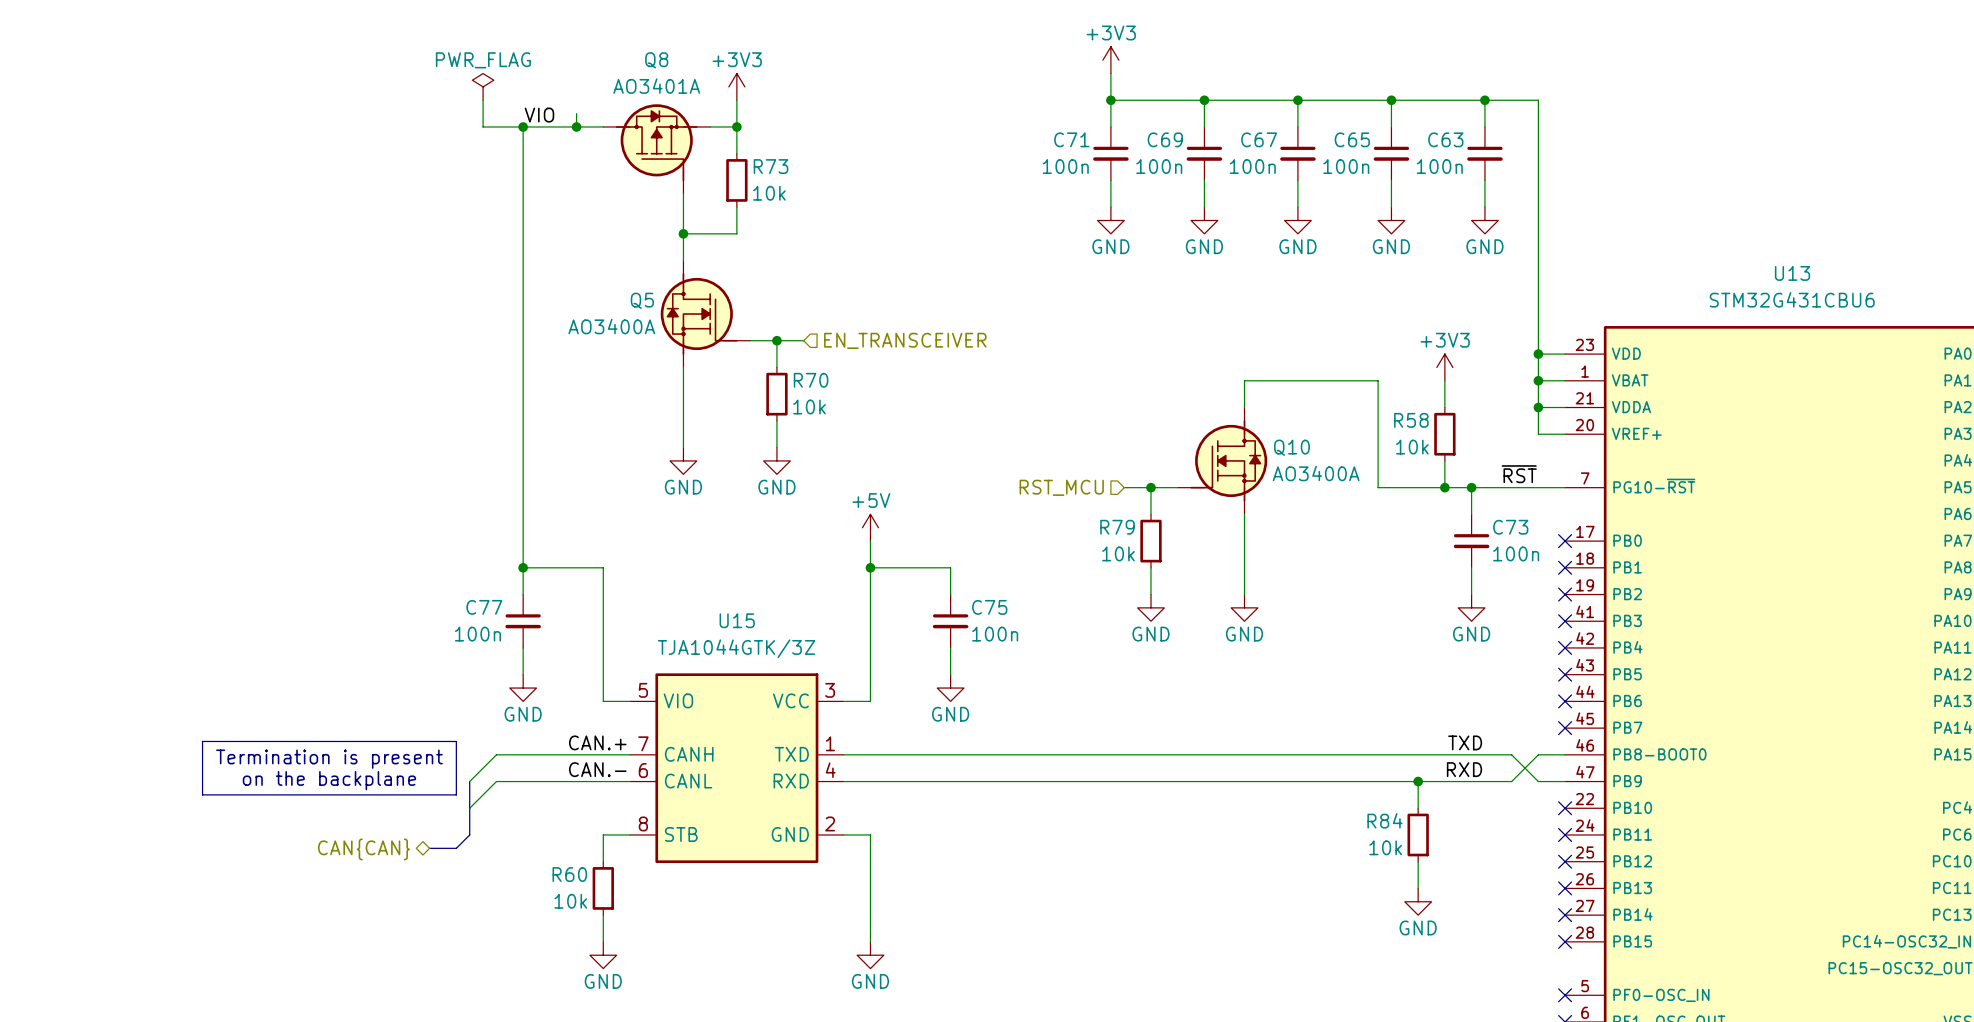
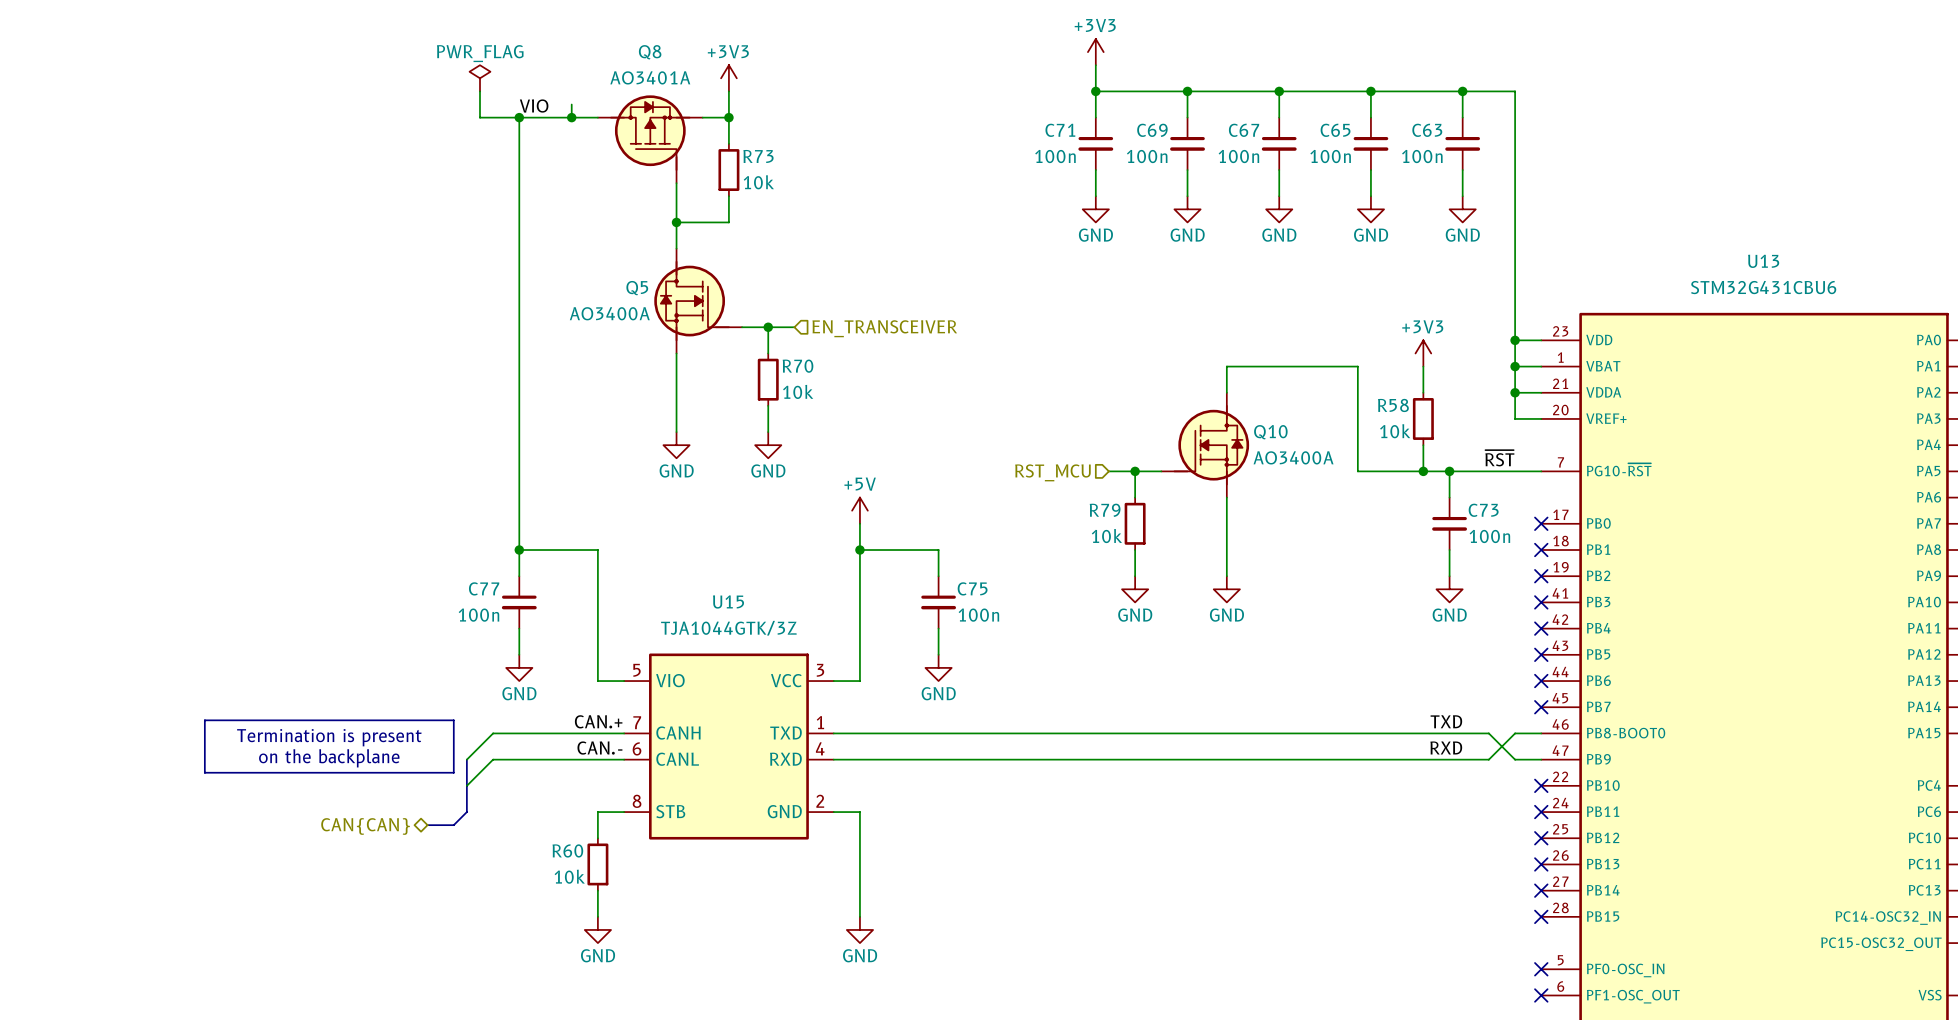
wire: (1418, 781) (1418, 808) -> none
junction: (1418, 781) -> none
R84: (1418, 834) -> none
wire: (1418, 861) (1418, 888) -> none
power symbol: GND (1418, 901) -> none

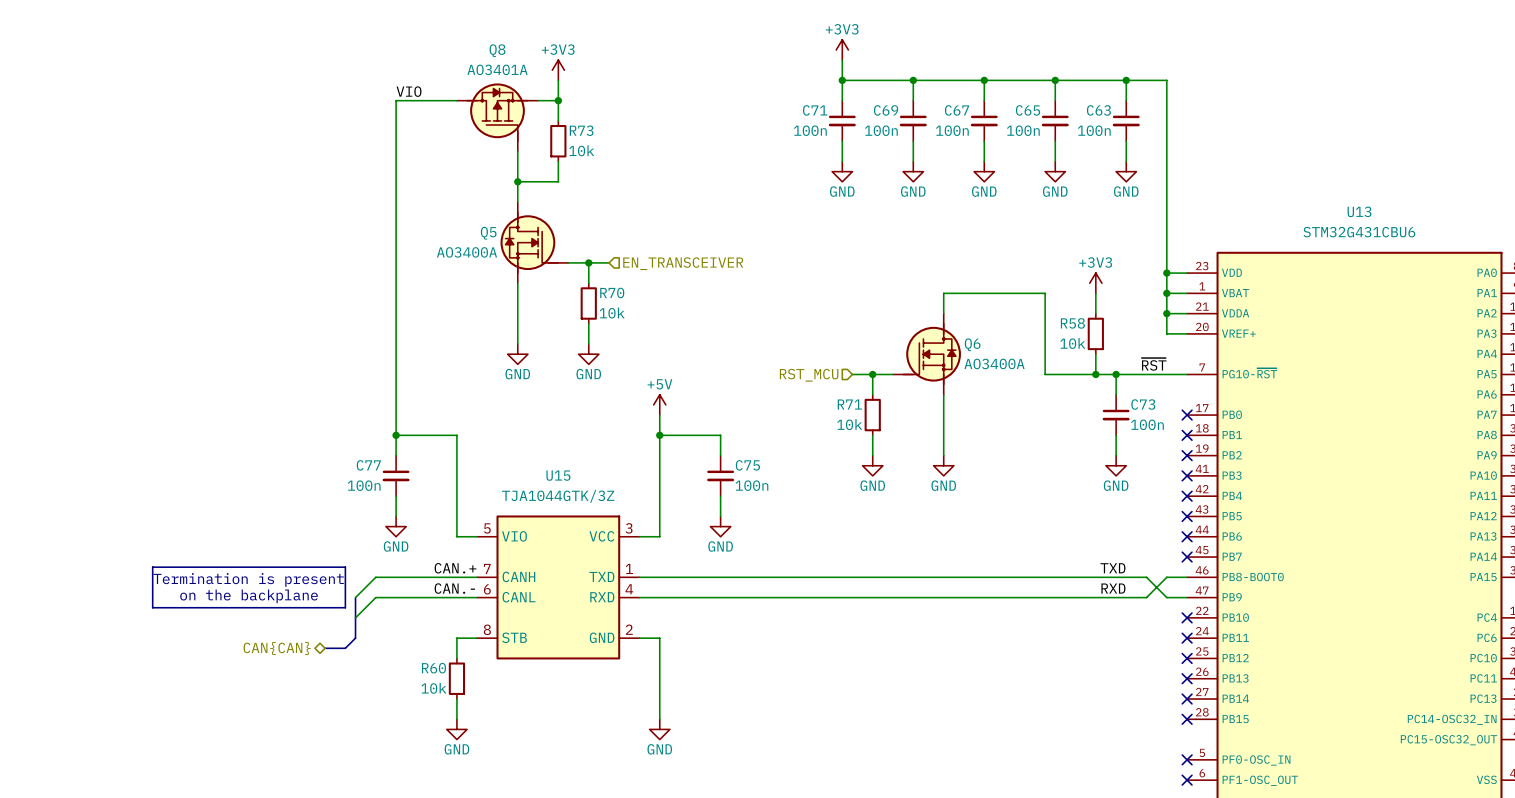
power symbol: PWR_FLAG (479, 78) -> none
wire: (479, 91) (479, 117) (519, 117) -> none
wire: (571, 104) (571, 117) -> none
junction: (519, 117) -> none
junction: (571, 117) -> none
Q10 name: Q10 (1270, 432) -> Q6 (972, 344)
R79 name: R79 (1105, 510) -> R71 (849, 404)

